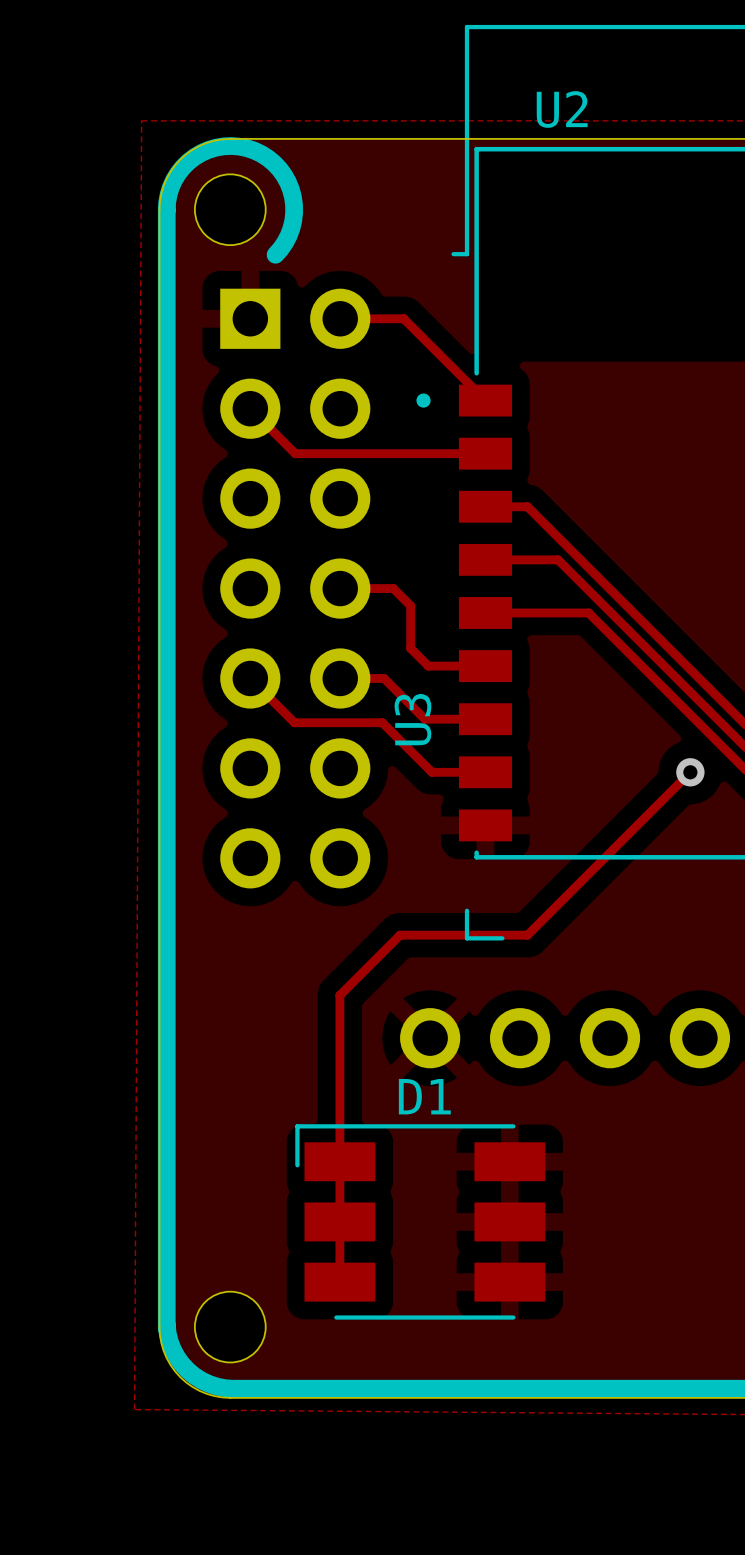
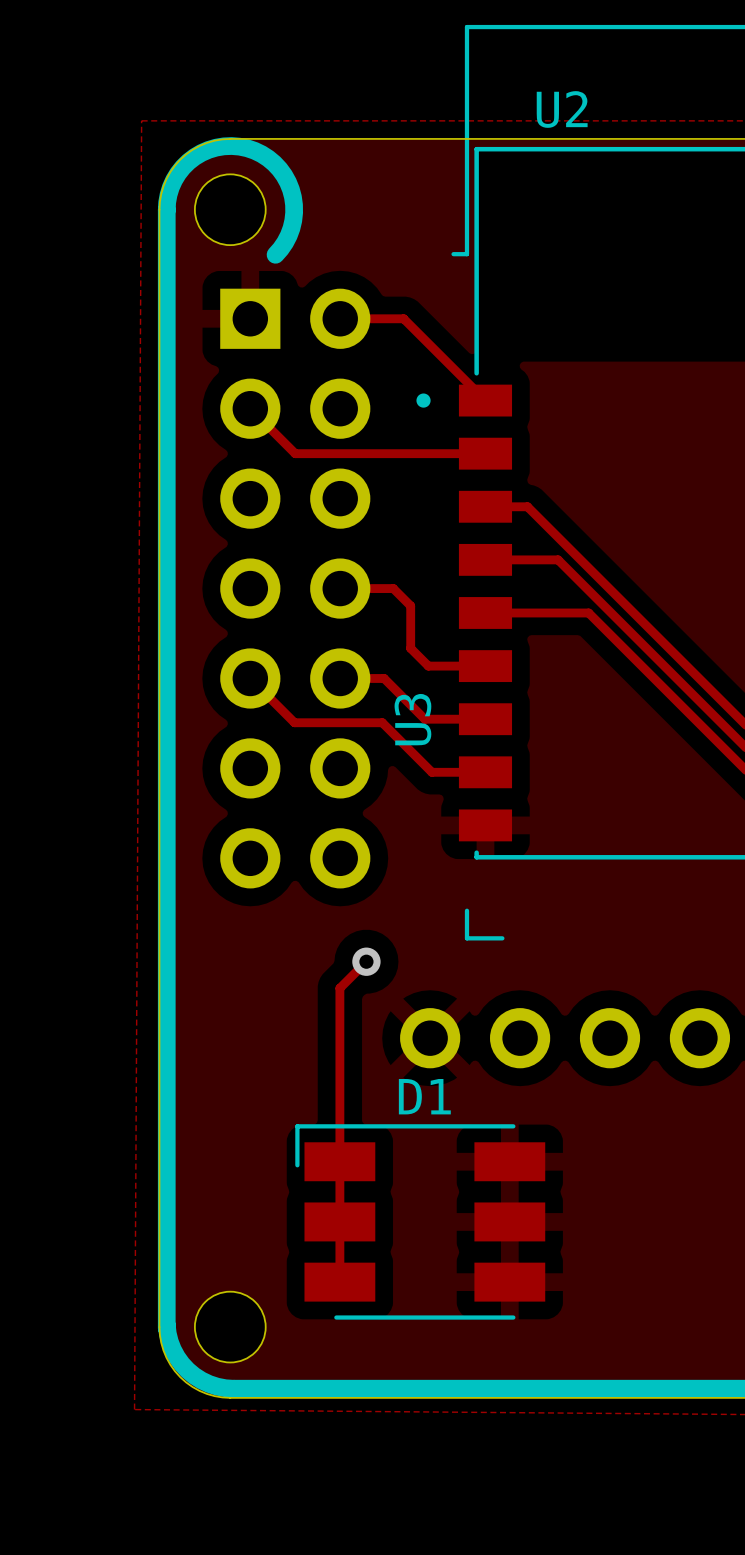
track: (690, 772) (527, 935) (400, 935) (339, 995) -> (366, 961) (339, 988) (339, 995)
via: (690, 772) -> none
via: none -> (366, 961)

